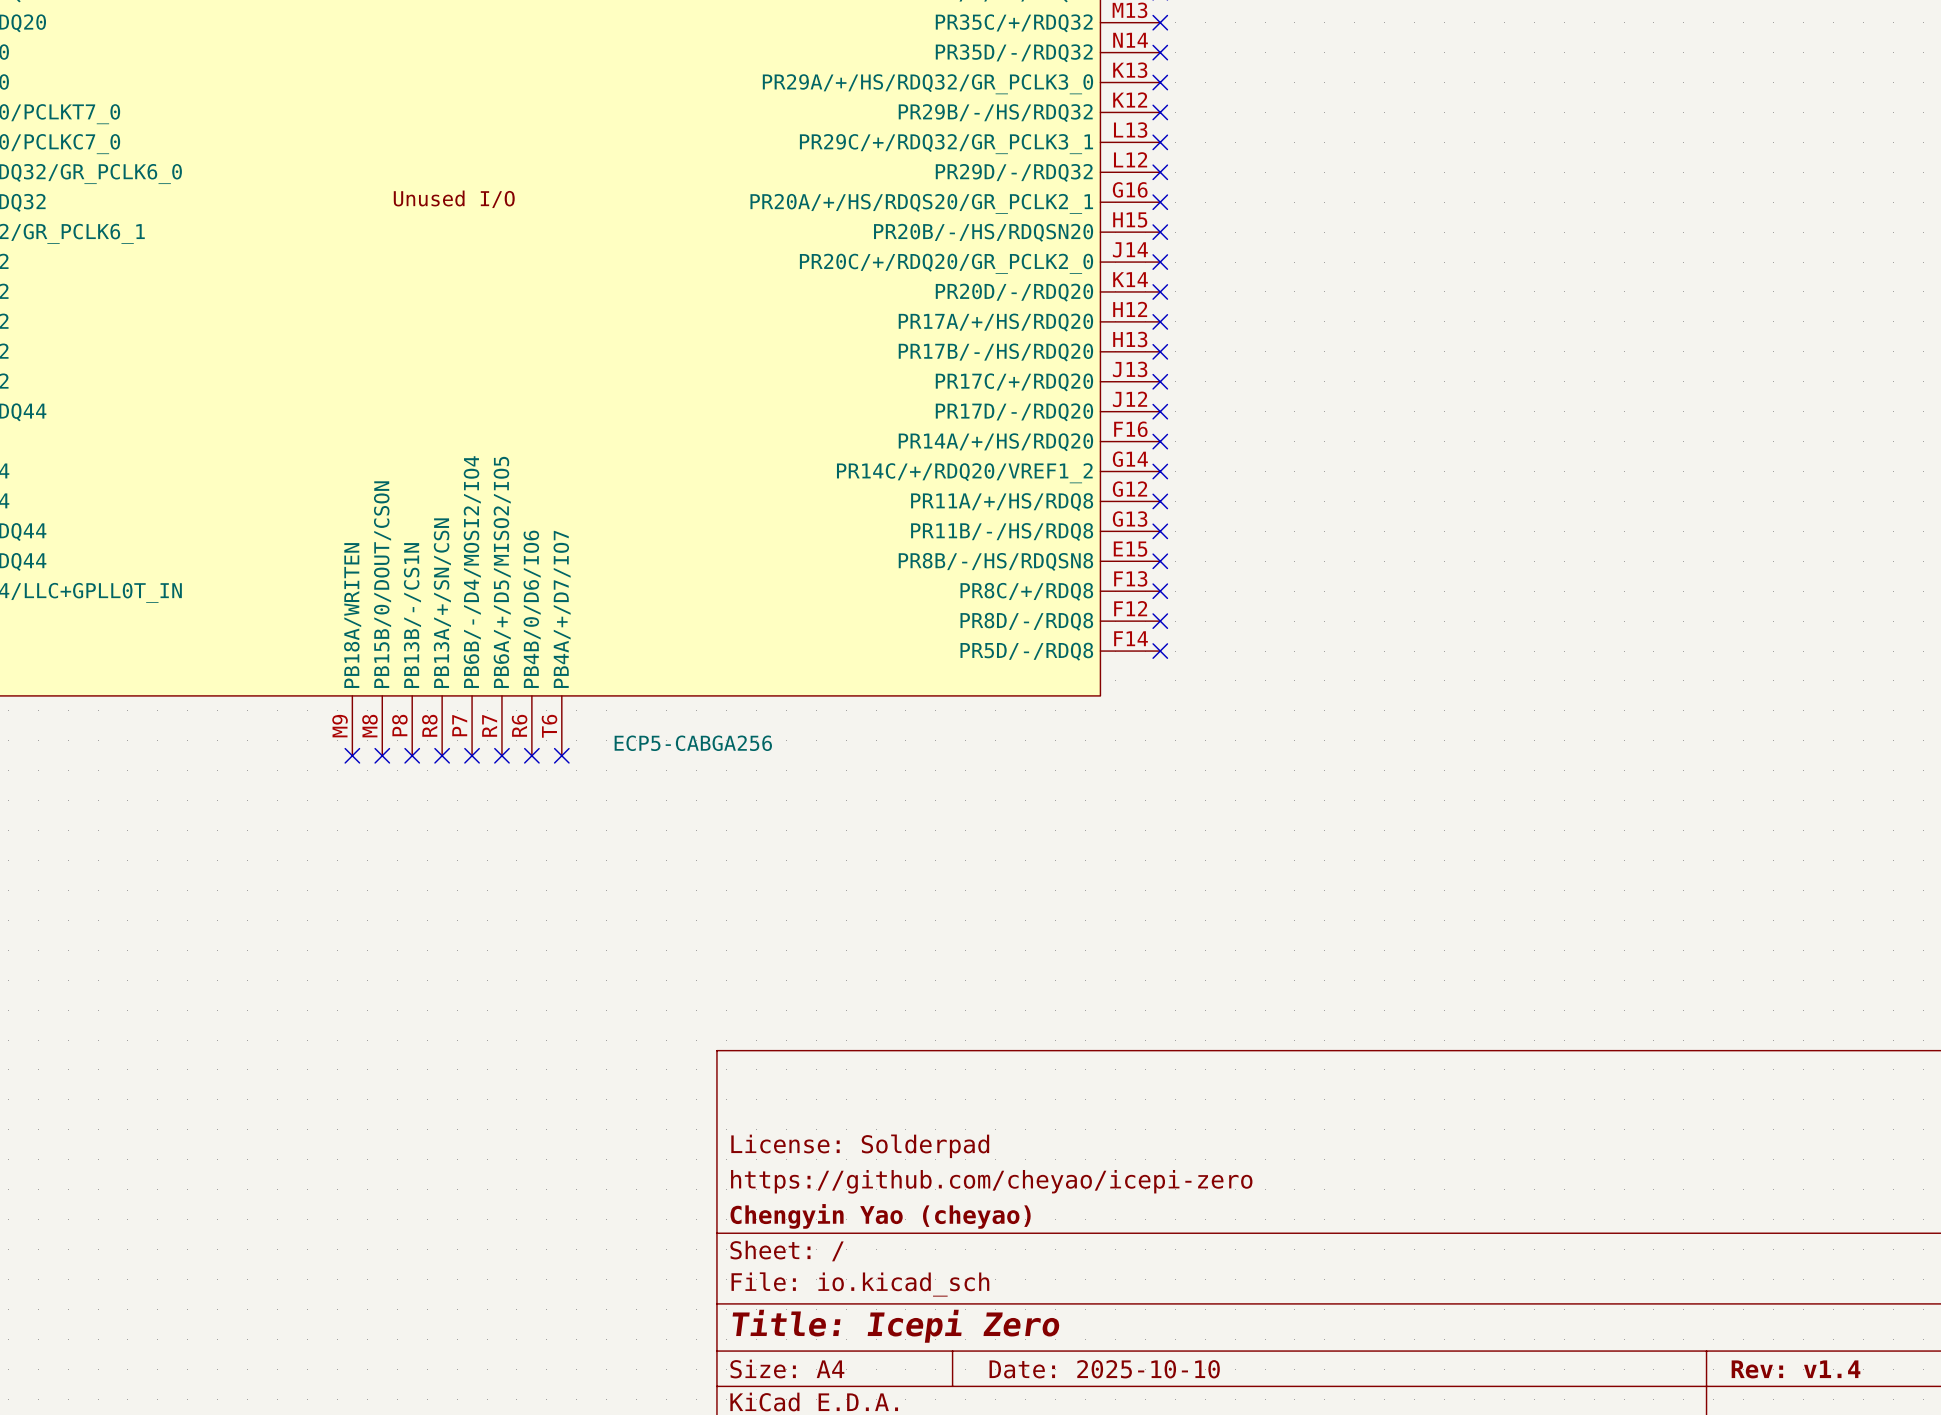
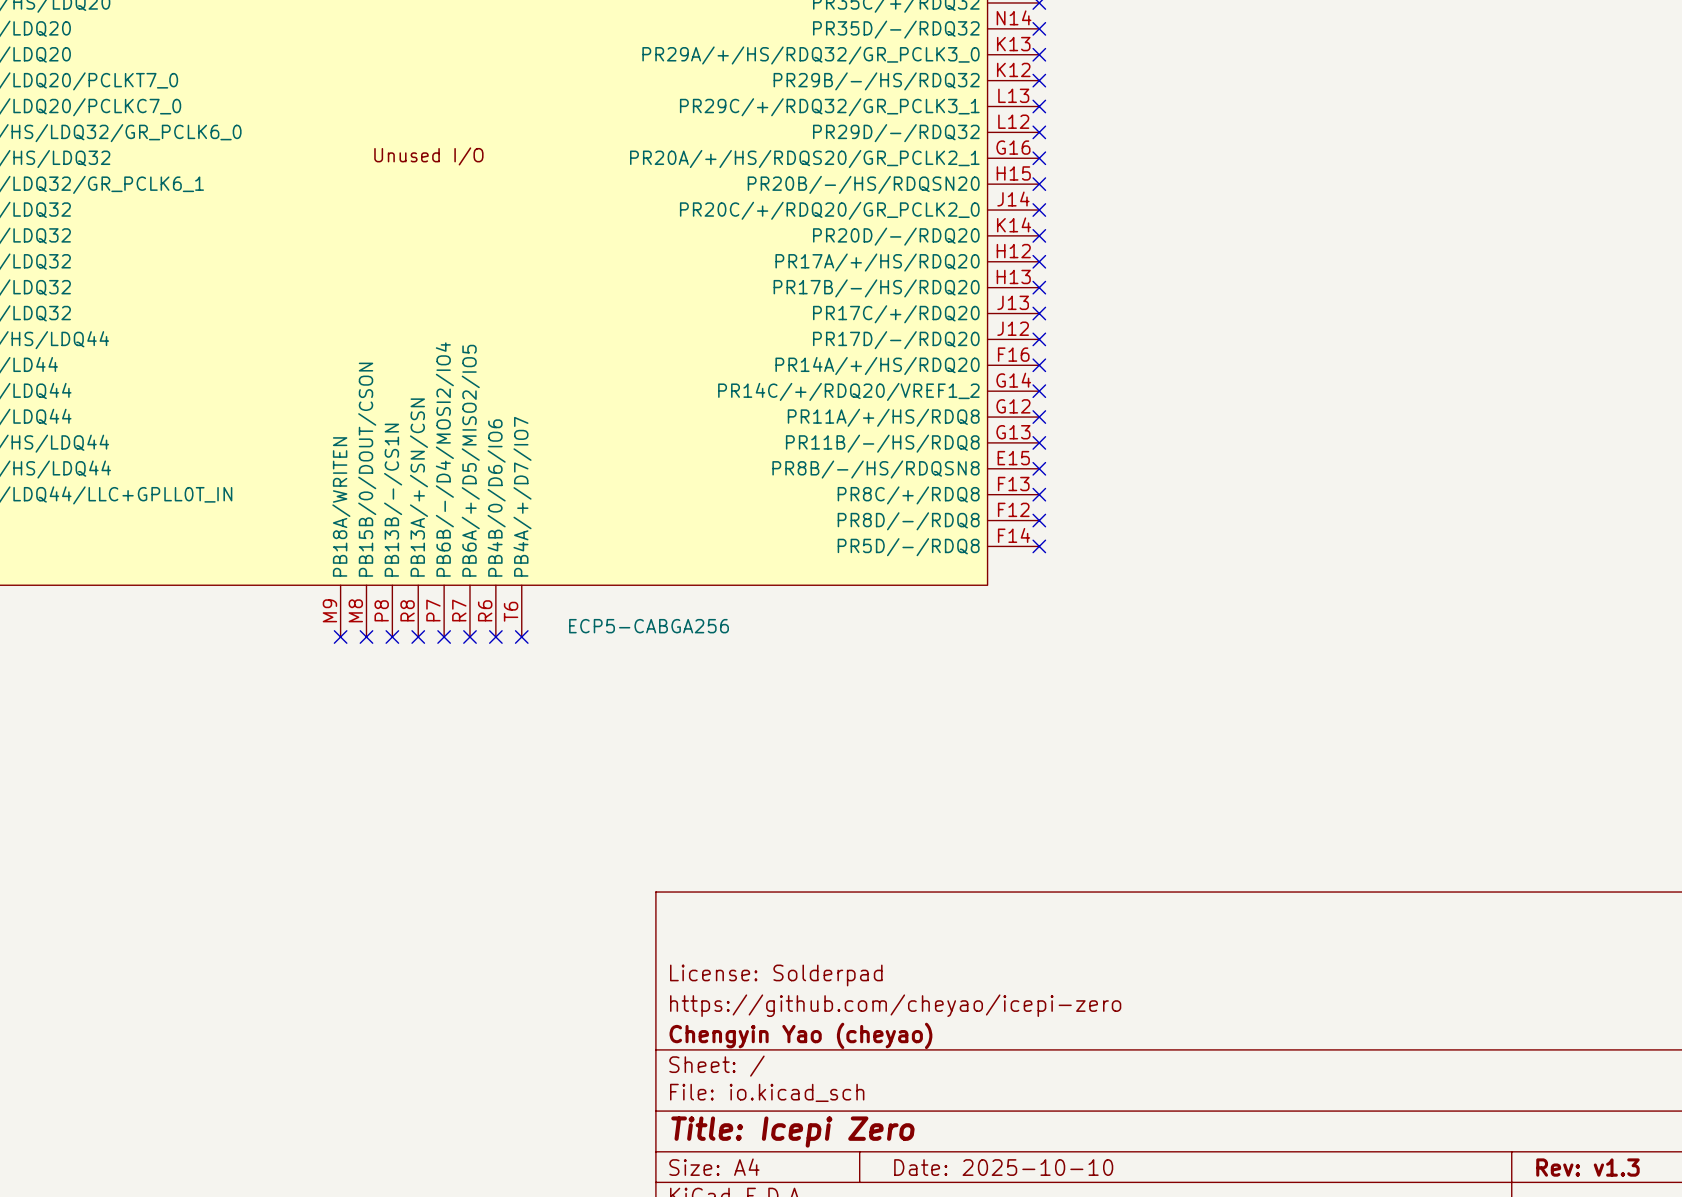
title block: Rev: v1.4 (1796, 1369) -> Rev: v1.3 (1587, 1167)

